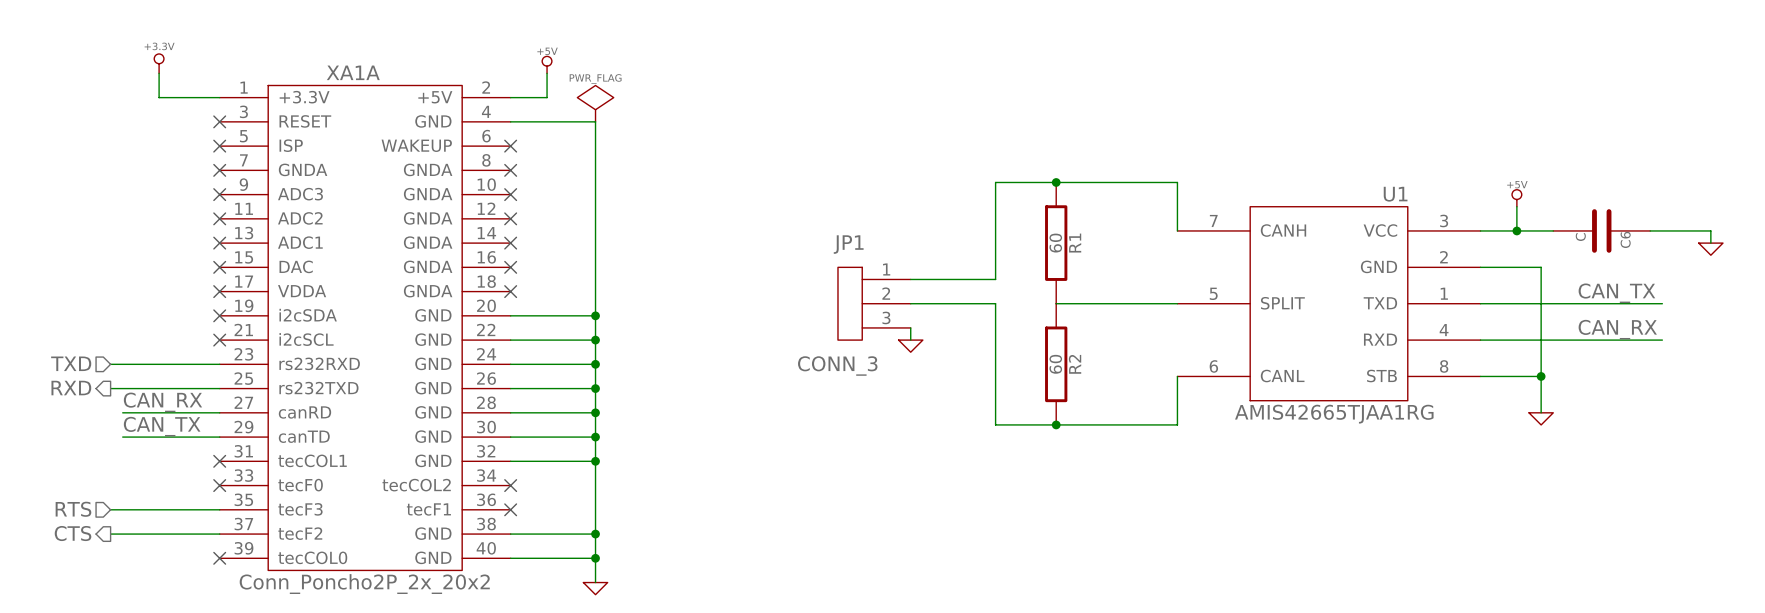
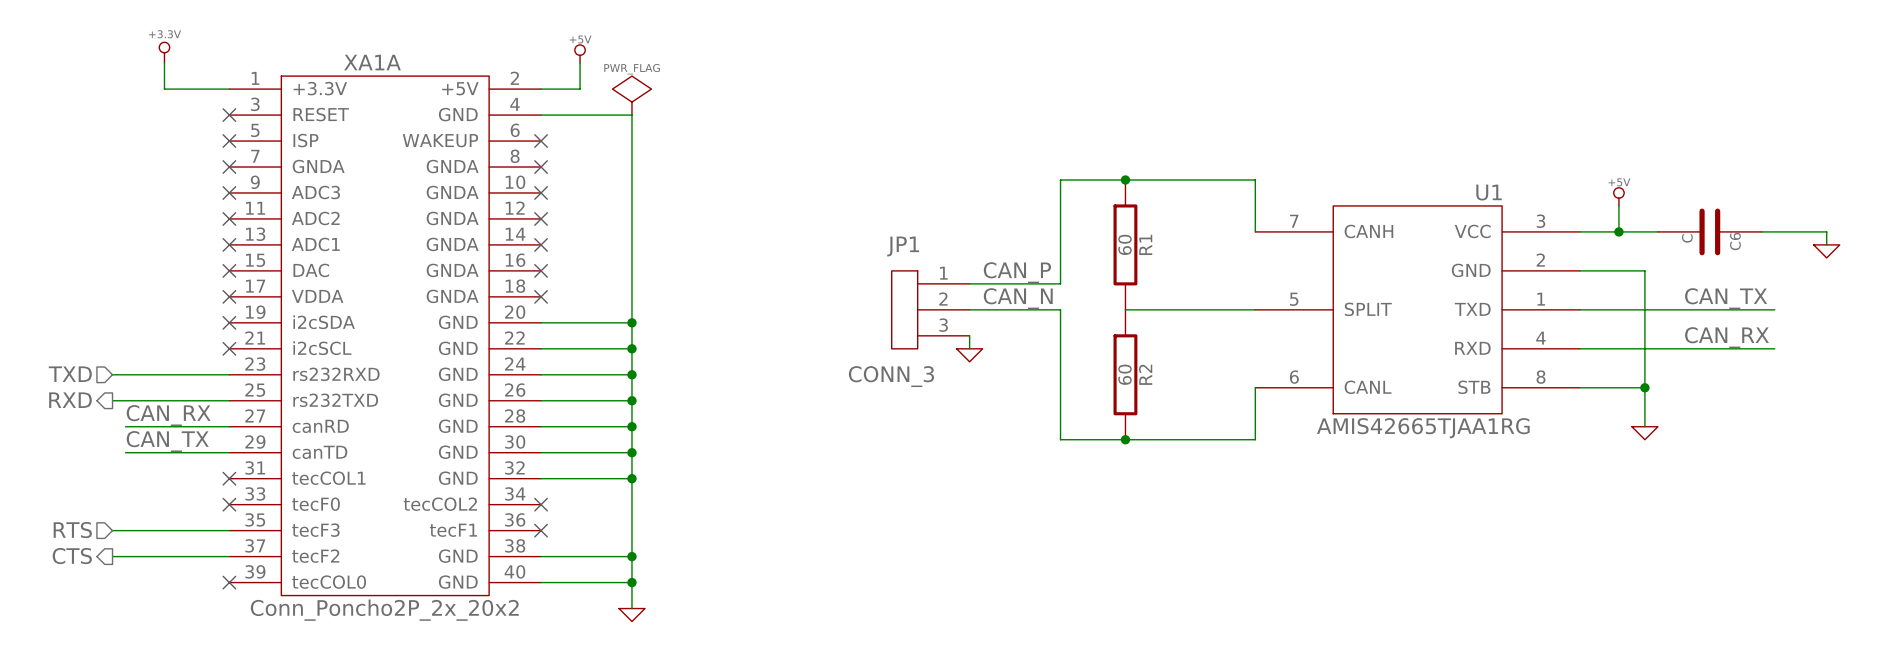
label: none -> CAN_P (1017, 272)
label: none -> CAN_N (1018, 298)

